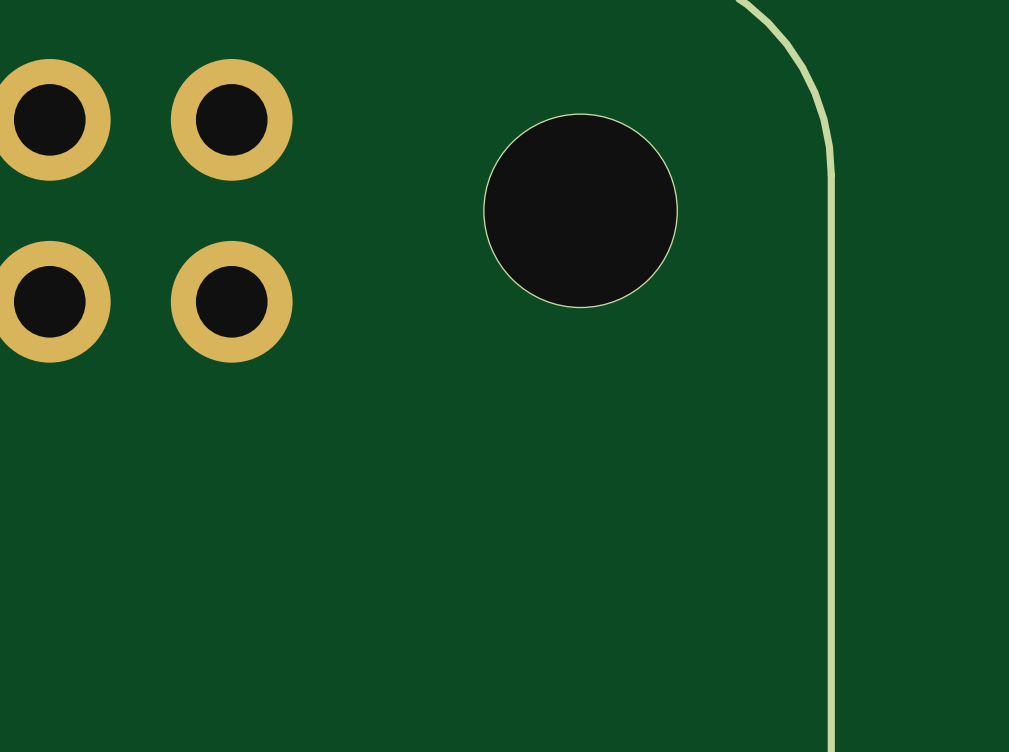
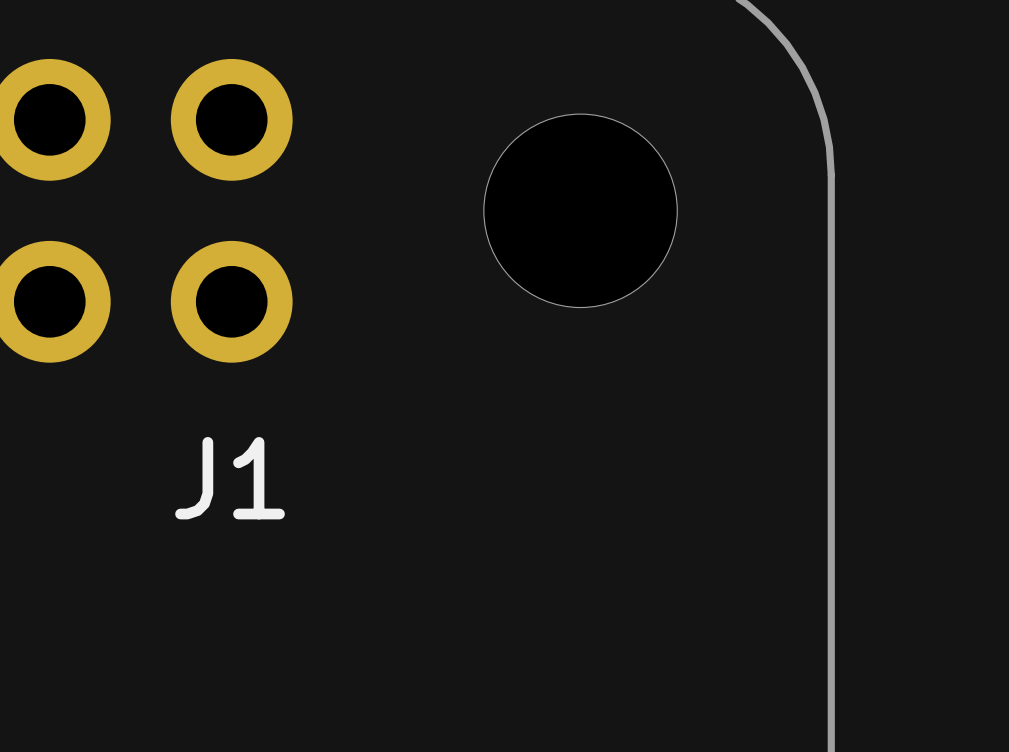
J1 name: none -> J1 (230, 478)

